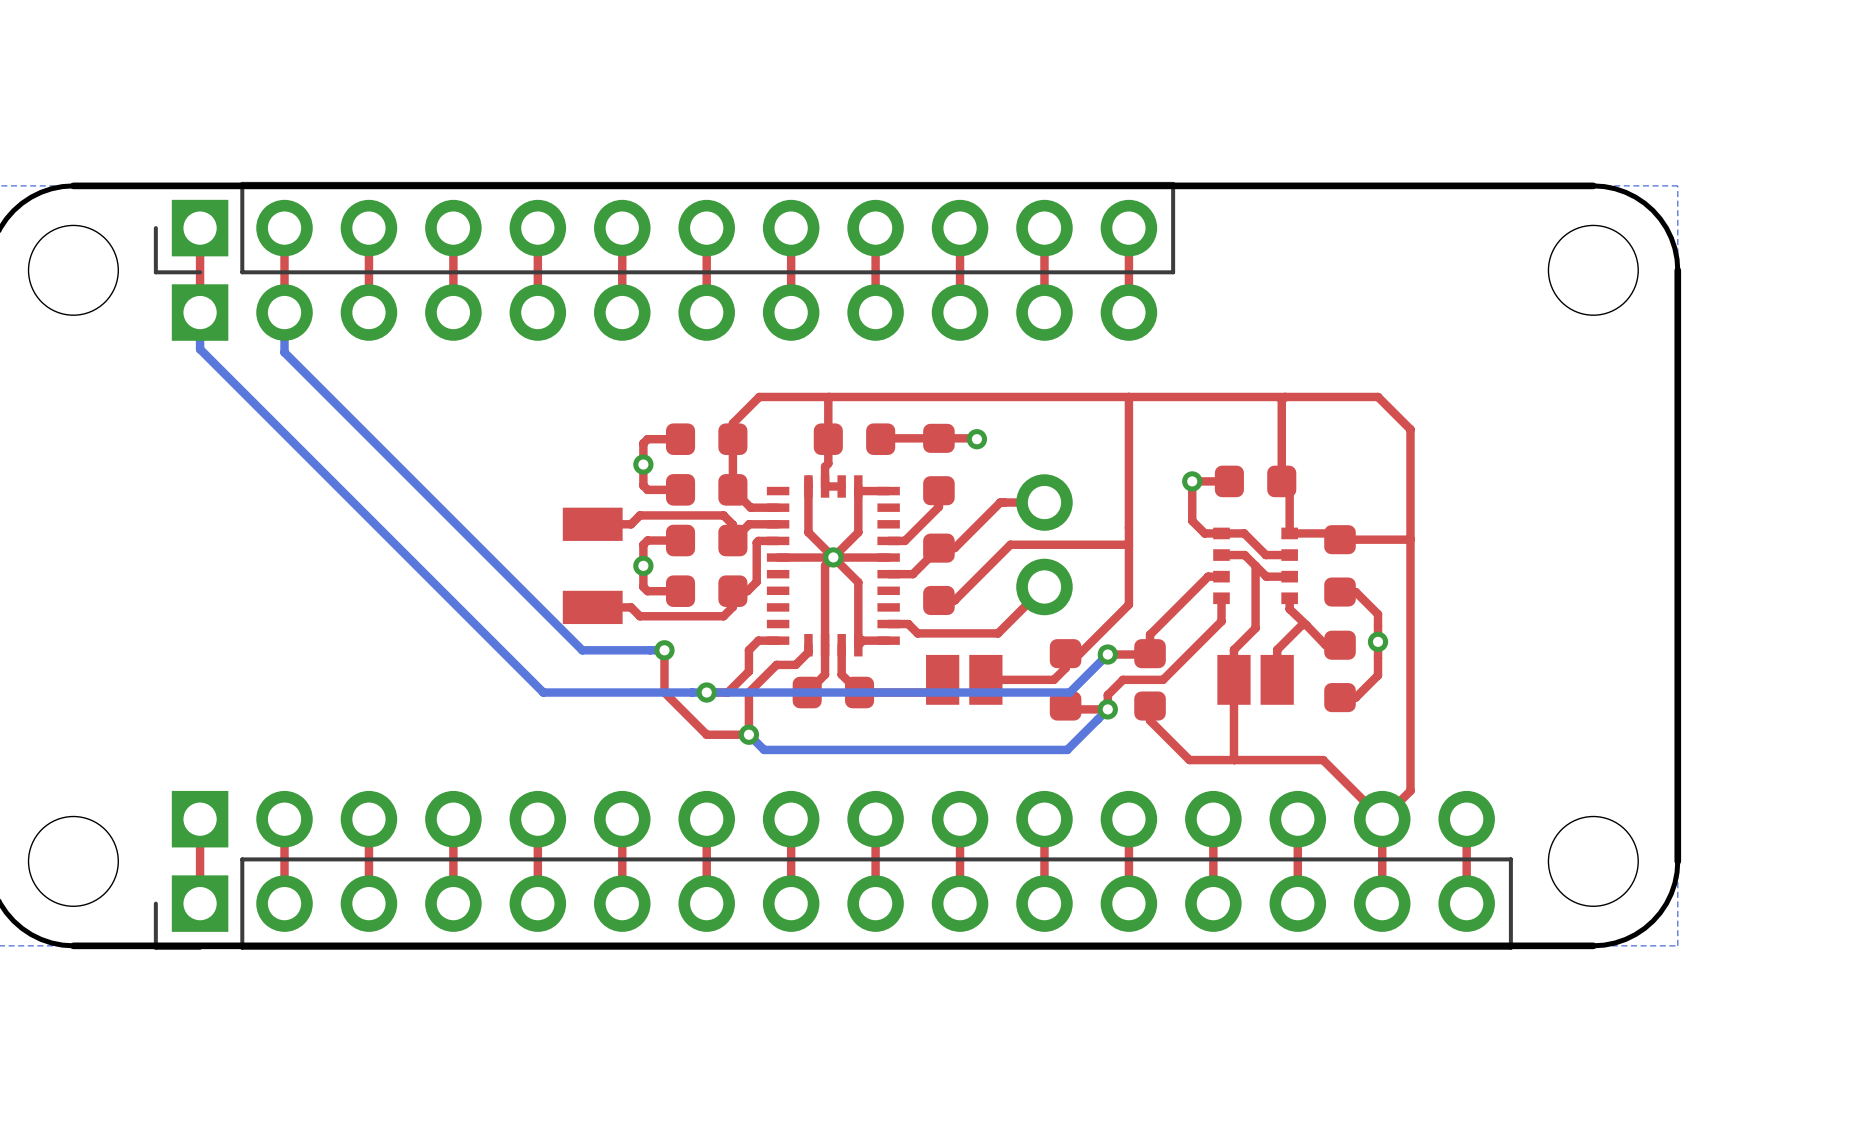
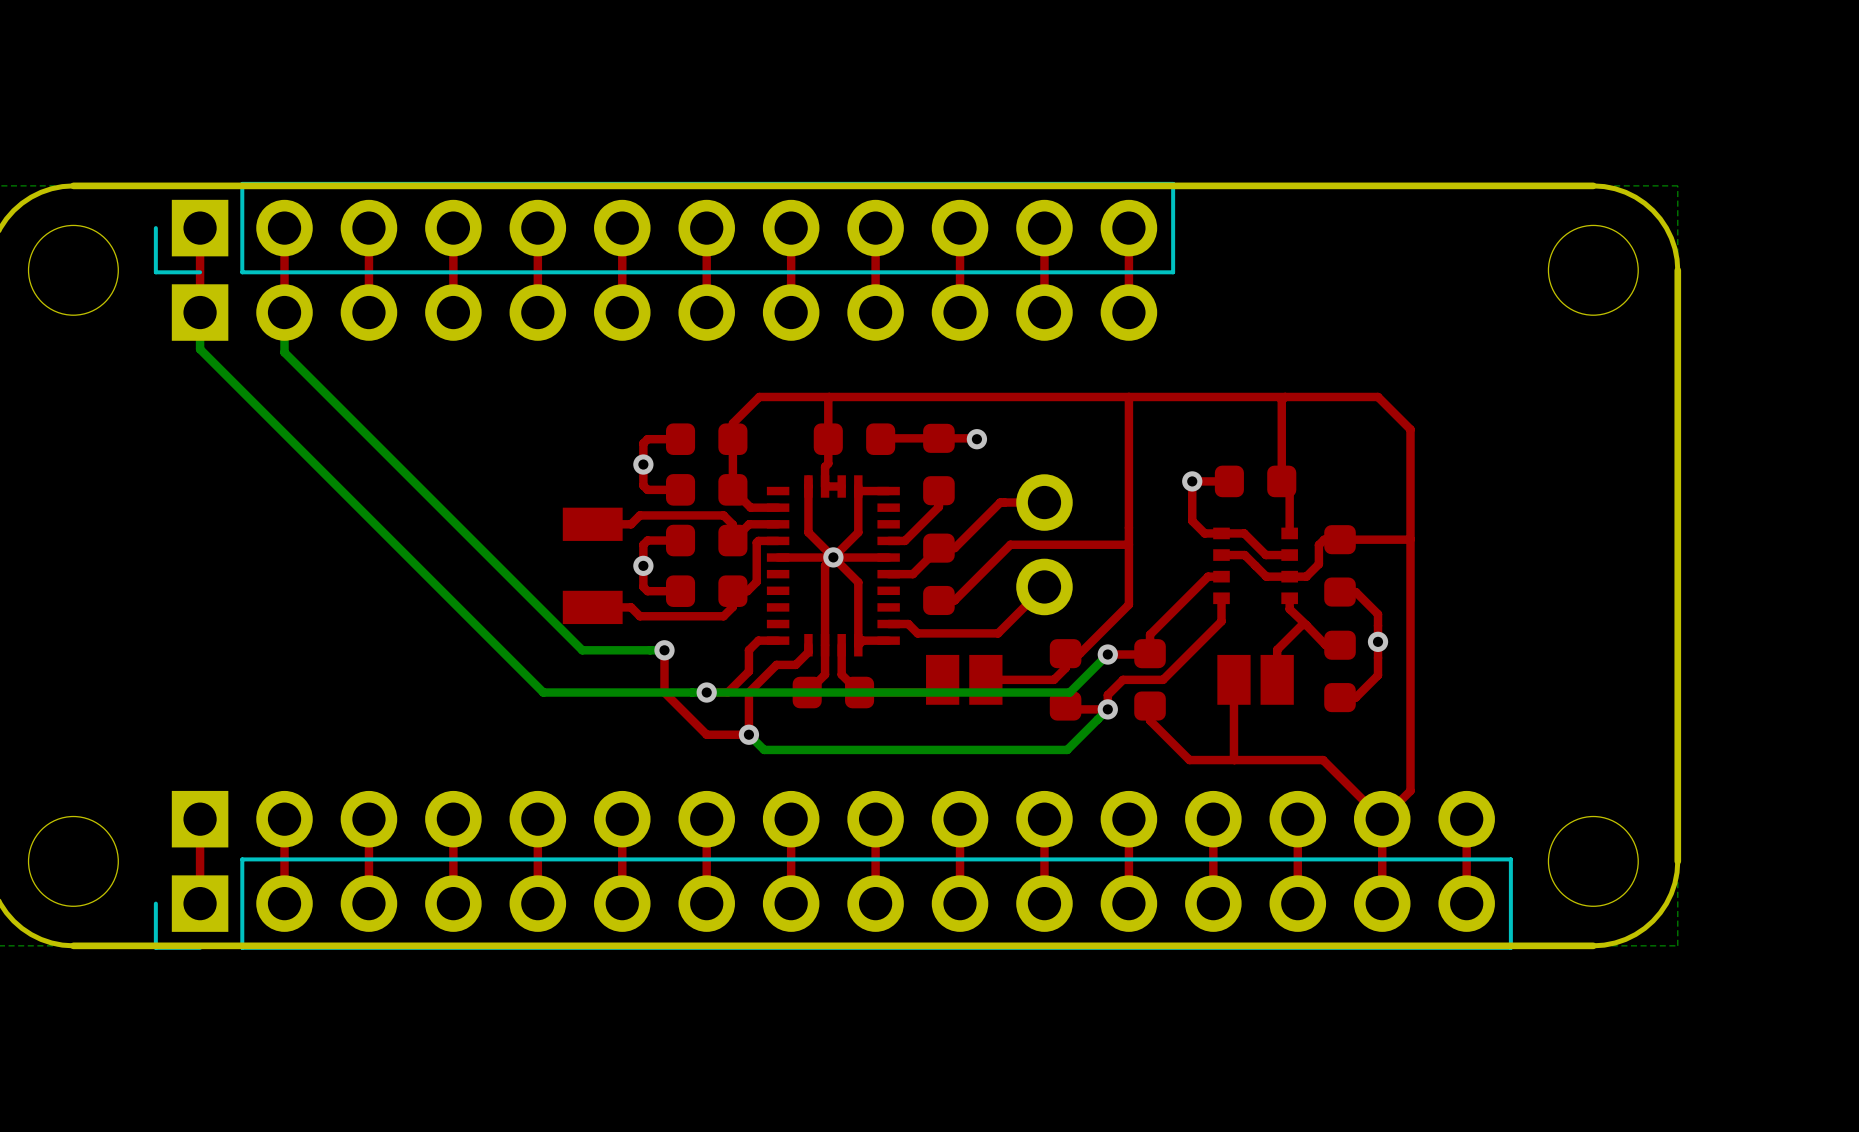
top track: (1289, 533) (1333, 533) (1340, 539) -> (1289, 576) (1306, 576) (1318, 564) (1318, 545) (1324, 539) (1340, 539)
top track: (1255, 565) (1255, 628) (1233, 649) (1233, 679) -> none

